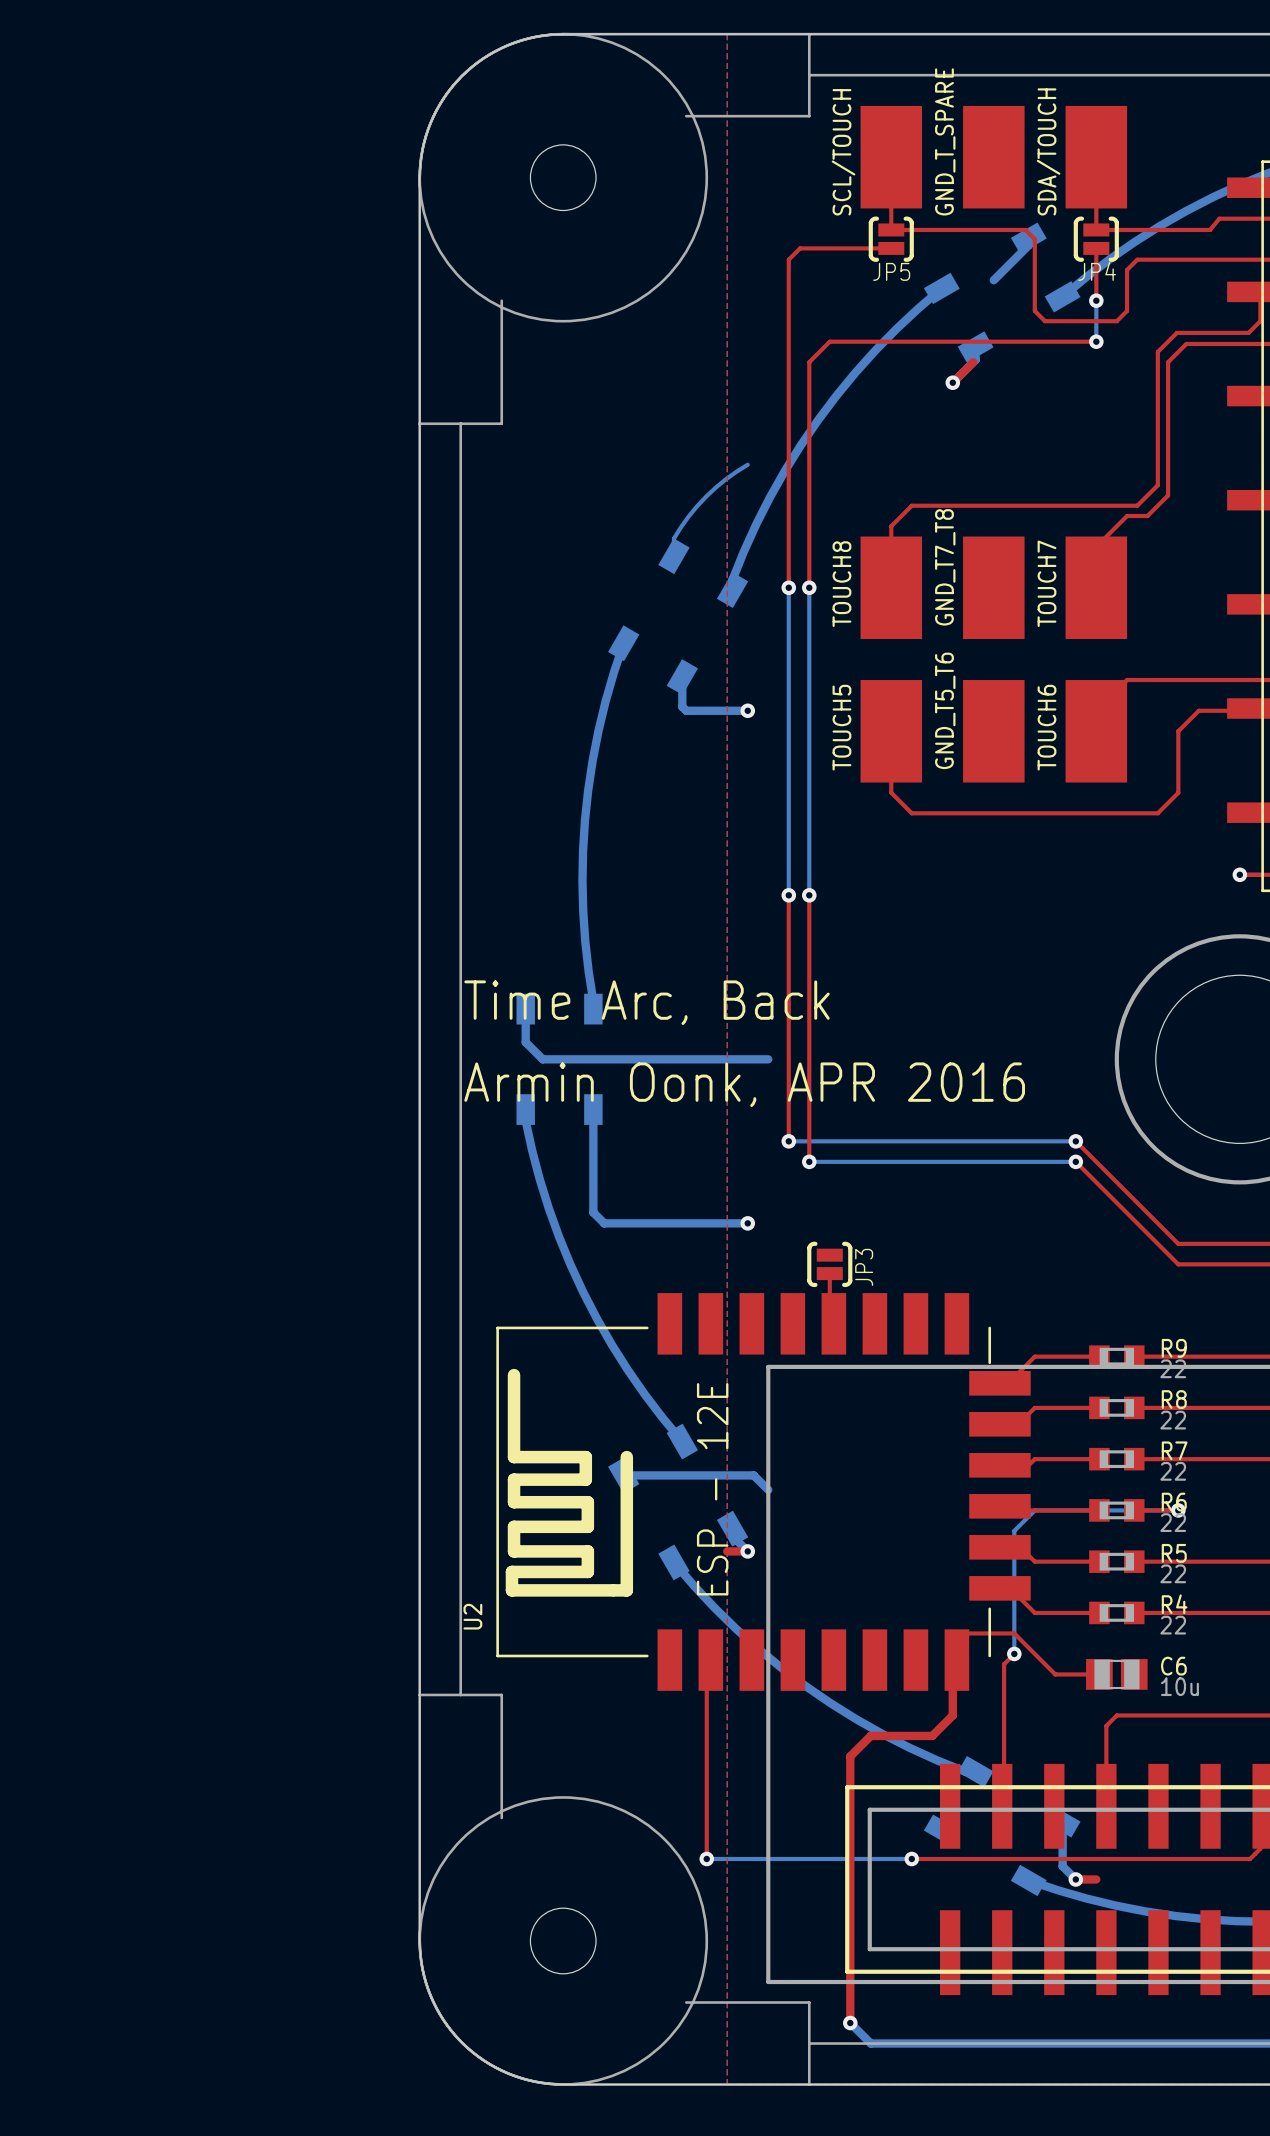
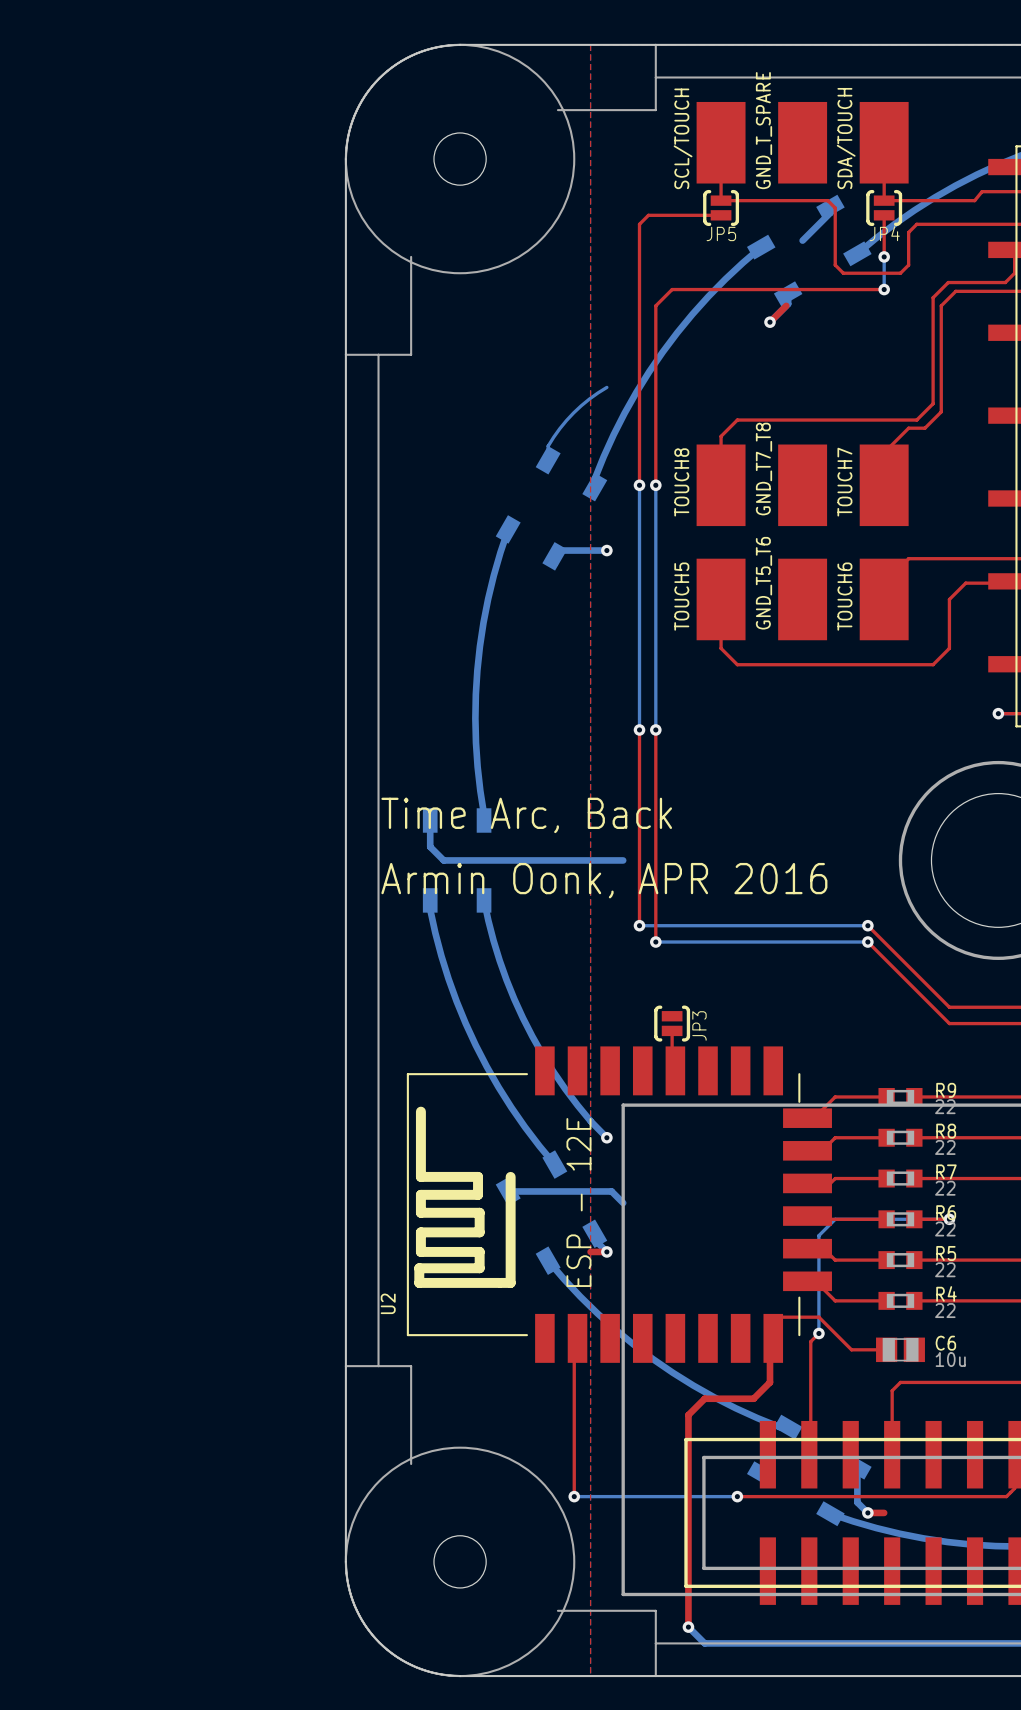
bottom track: (682, 686) (682, 706) (686, 710) (747, 710) -> (554, 563) (557, 550) (606, 550)
via position: (747, 710) -> (606, 550)
bottom track: (593, 1109) (593, 1212) (604, 1223) (747, 1223) -> (484, 900) (493, 940) (506, 979) (532, 1036) (565, 1088) (590, 1121) (606, 1137)
via: (747, 1223) -> none
via: none -> (606, 1137)

